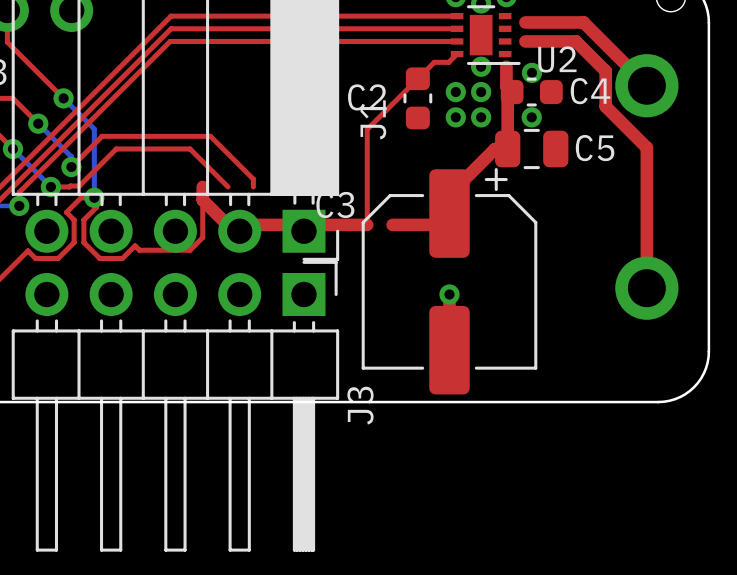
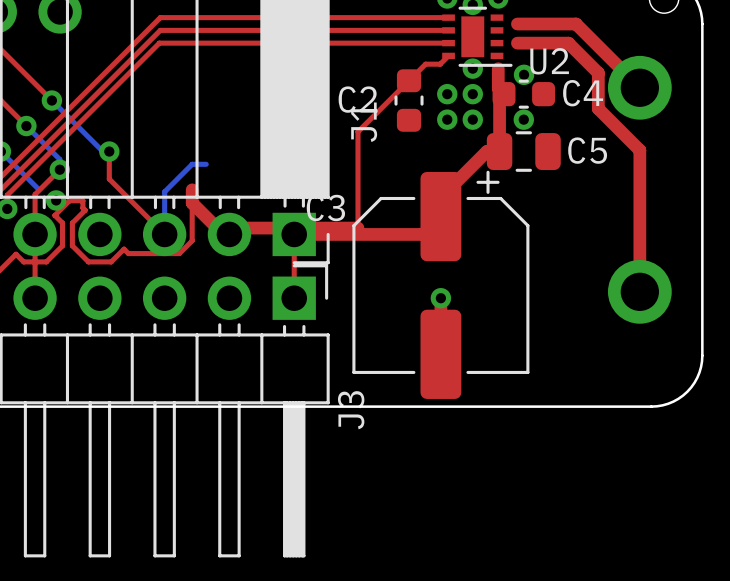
bottom track: (94, 129) (94, 197) -> (82, 131) (102, 151) (109, 151)
top track: none -> (109, 151) (109, 179) (164, 234)
via: none -> (109, 151)
bottom track: none -> (206, 164) (192, 164) (164, 191) (164, 234)
top track: (71, 167) (102, 136) (210, 136) (253, 179) (253, 186) -> (59, 169) (35, 194) (35, 298)
top track: (50, 186) (79, 186) (116, 149) (190, 149) (228, 186) -> none
via position: (50, 186) -> (56, 200)
via: (94, 197) -> none
top track: (392, 224) (438, 224) -> (294, 298) (294, 234) (423, 234) (429, 228)

